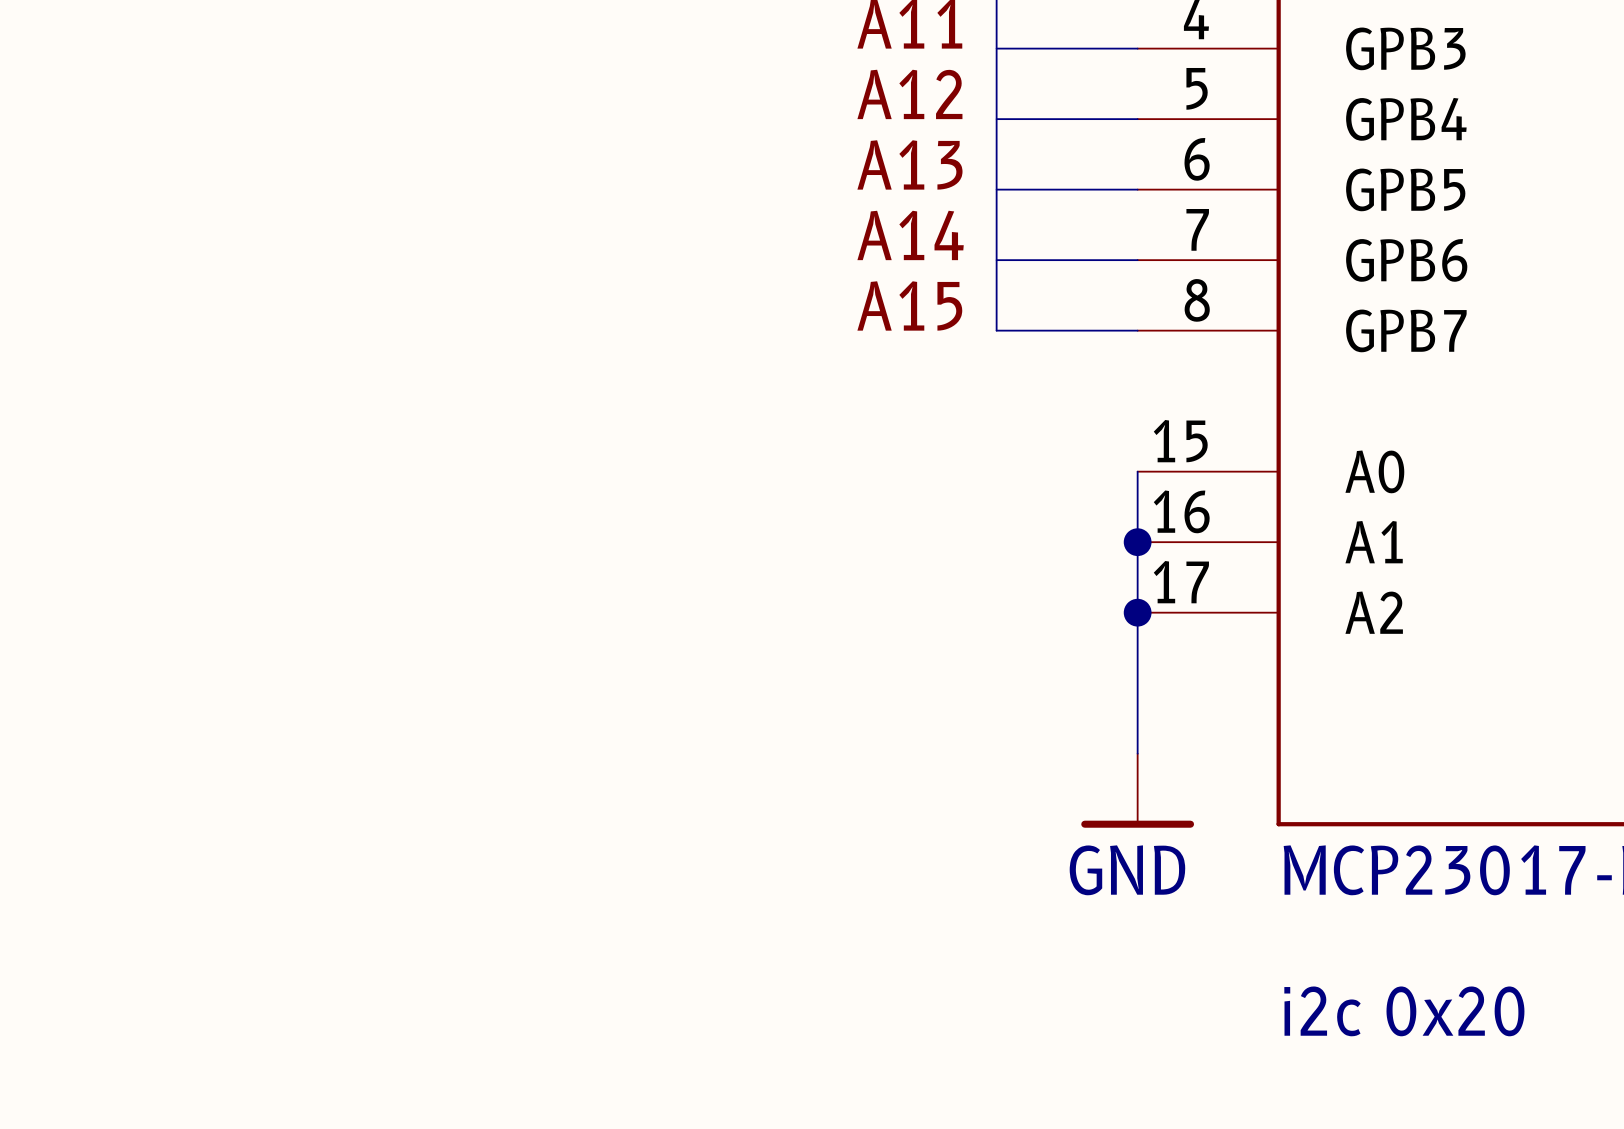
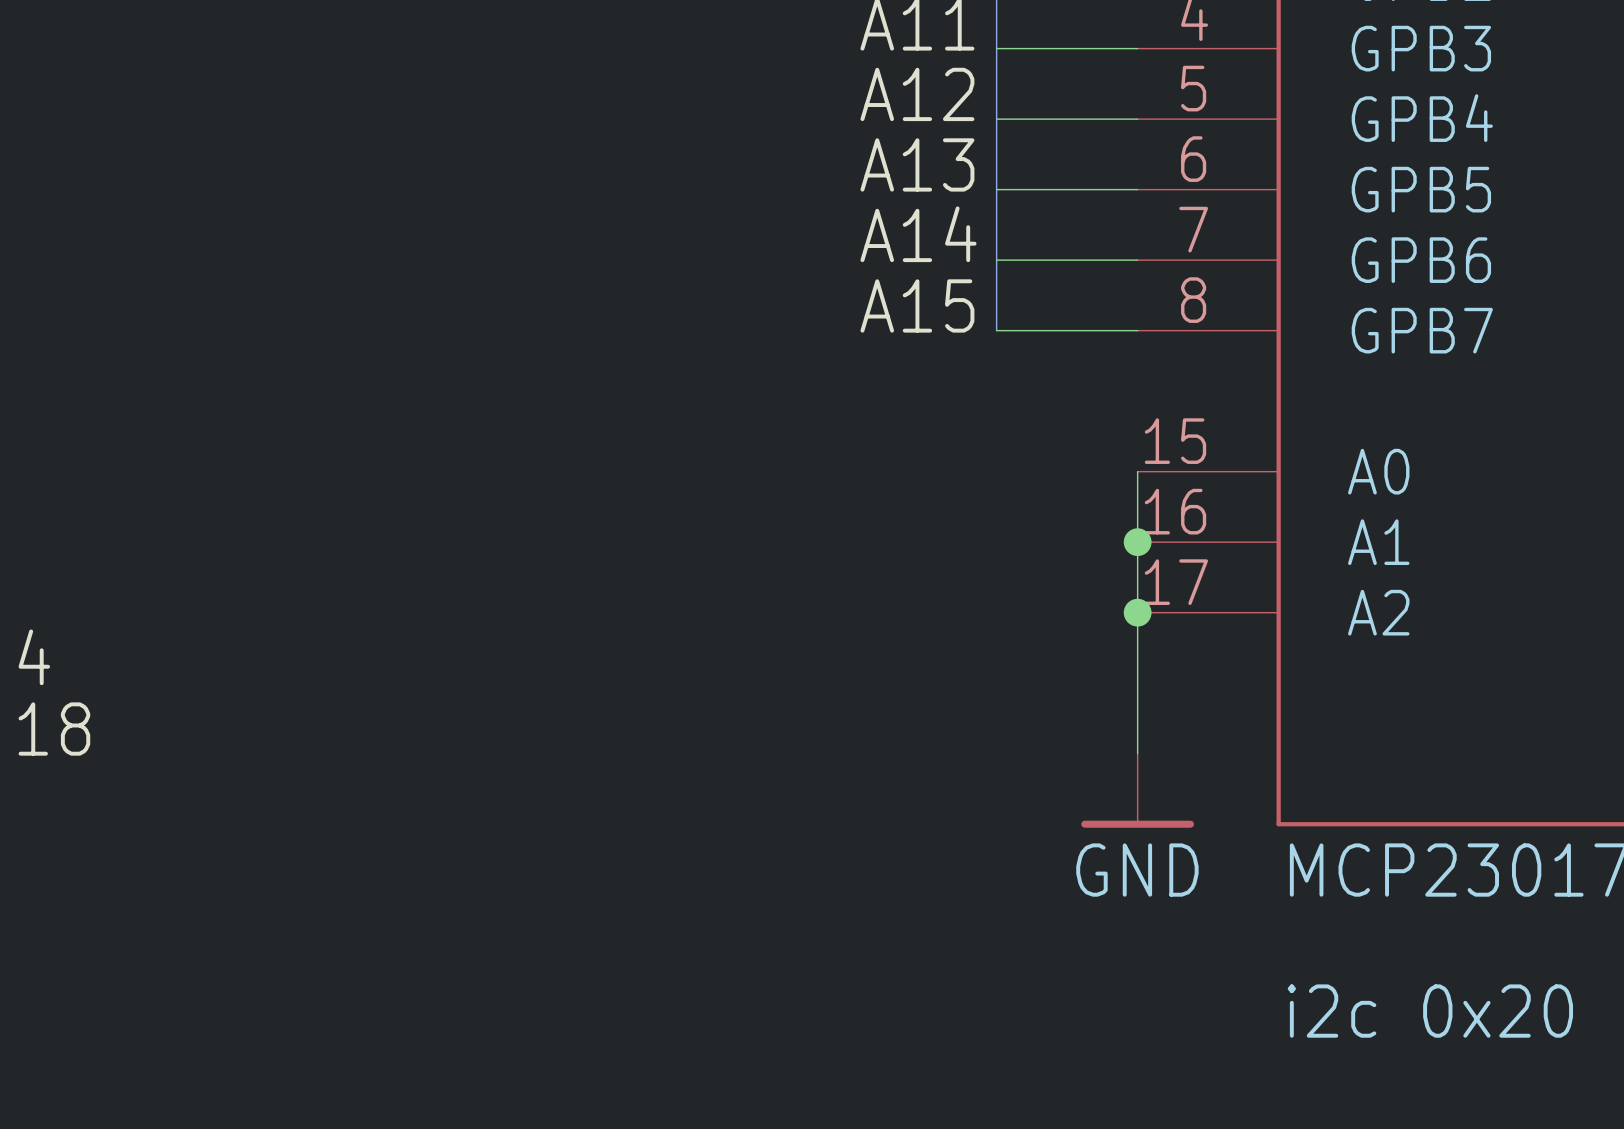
label: none -> 4 (34, 657)
label: none -> 18 (54, 729)

